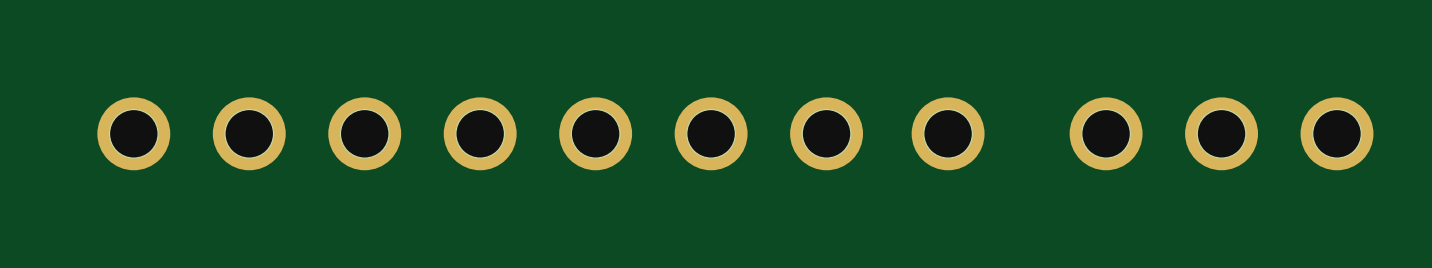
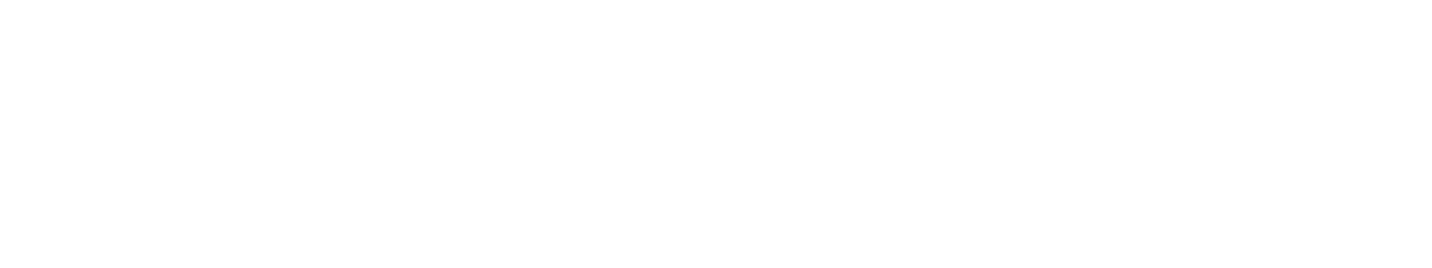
part: (133, 133) -> none
part: (249, 133) -> none
part: (364, 133) -> none
part: (480, 133) -> none
part: (595, 133) -> none
part: (711, 133) -> none
part: (826, 133) -> none
part: (948, 133) -> none
part: (1106, 133) -> none
part: (1221, 133) -> none
part: (1337, 133) -> none

